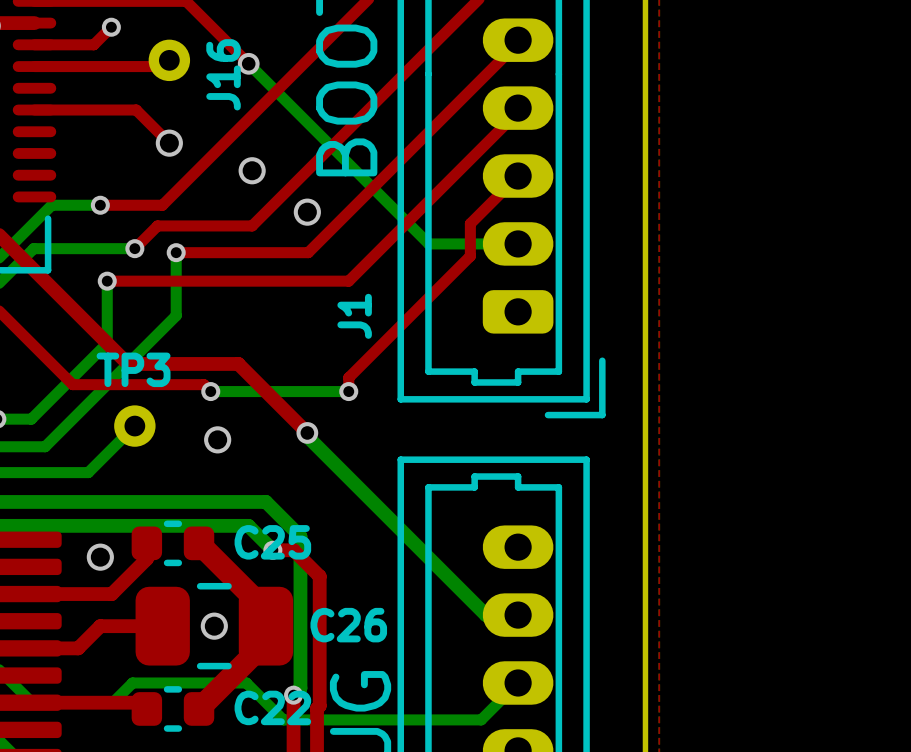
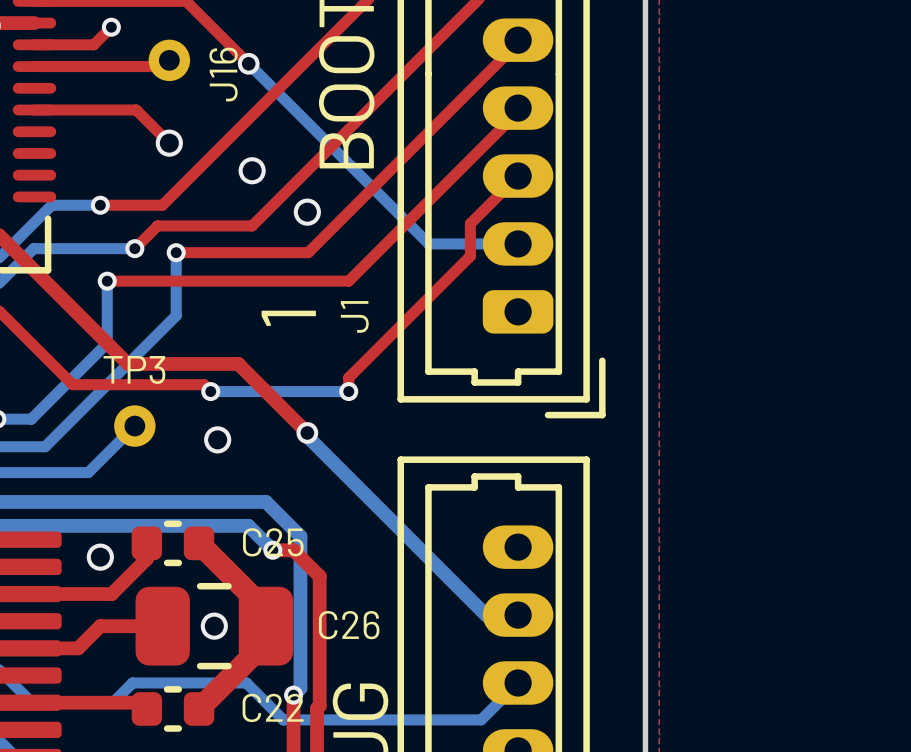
text: none -> 1 (288, 318)

